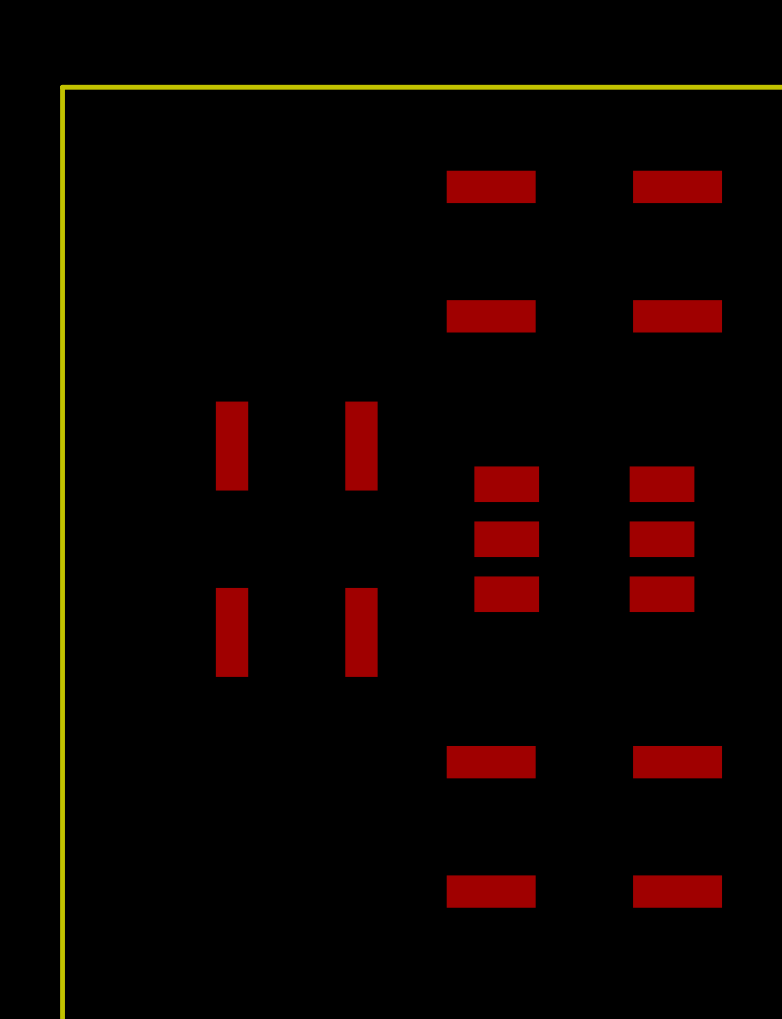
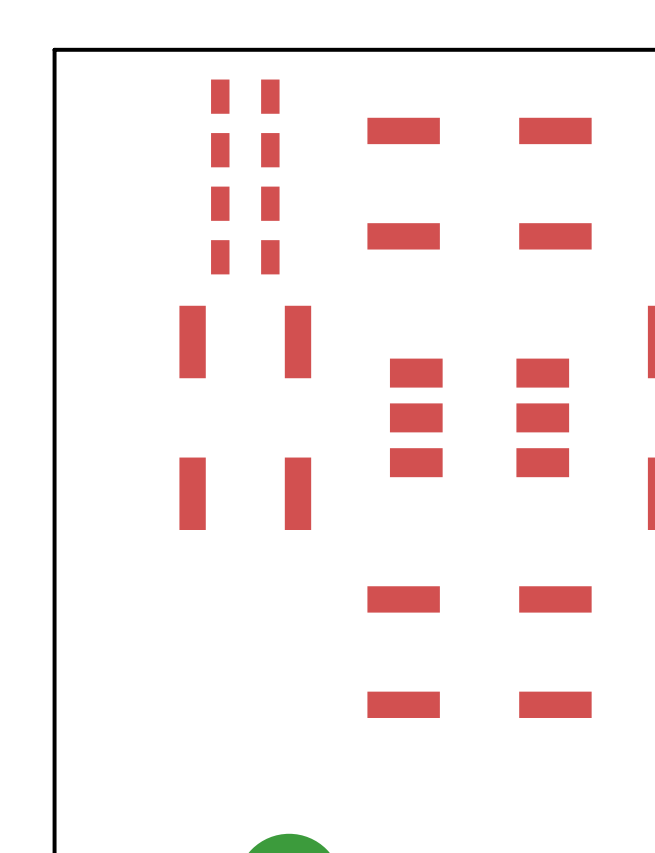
part: none -> (245, 96)
part: none -> (245, 150)
part: none -> (245, 203)
part: none -> (245, 257)

